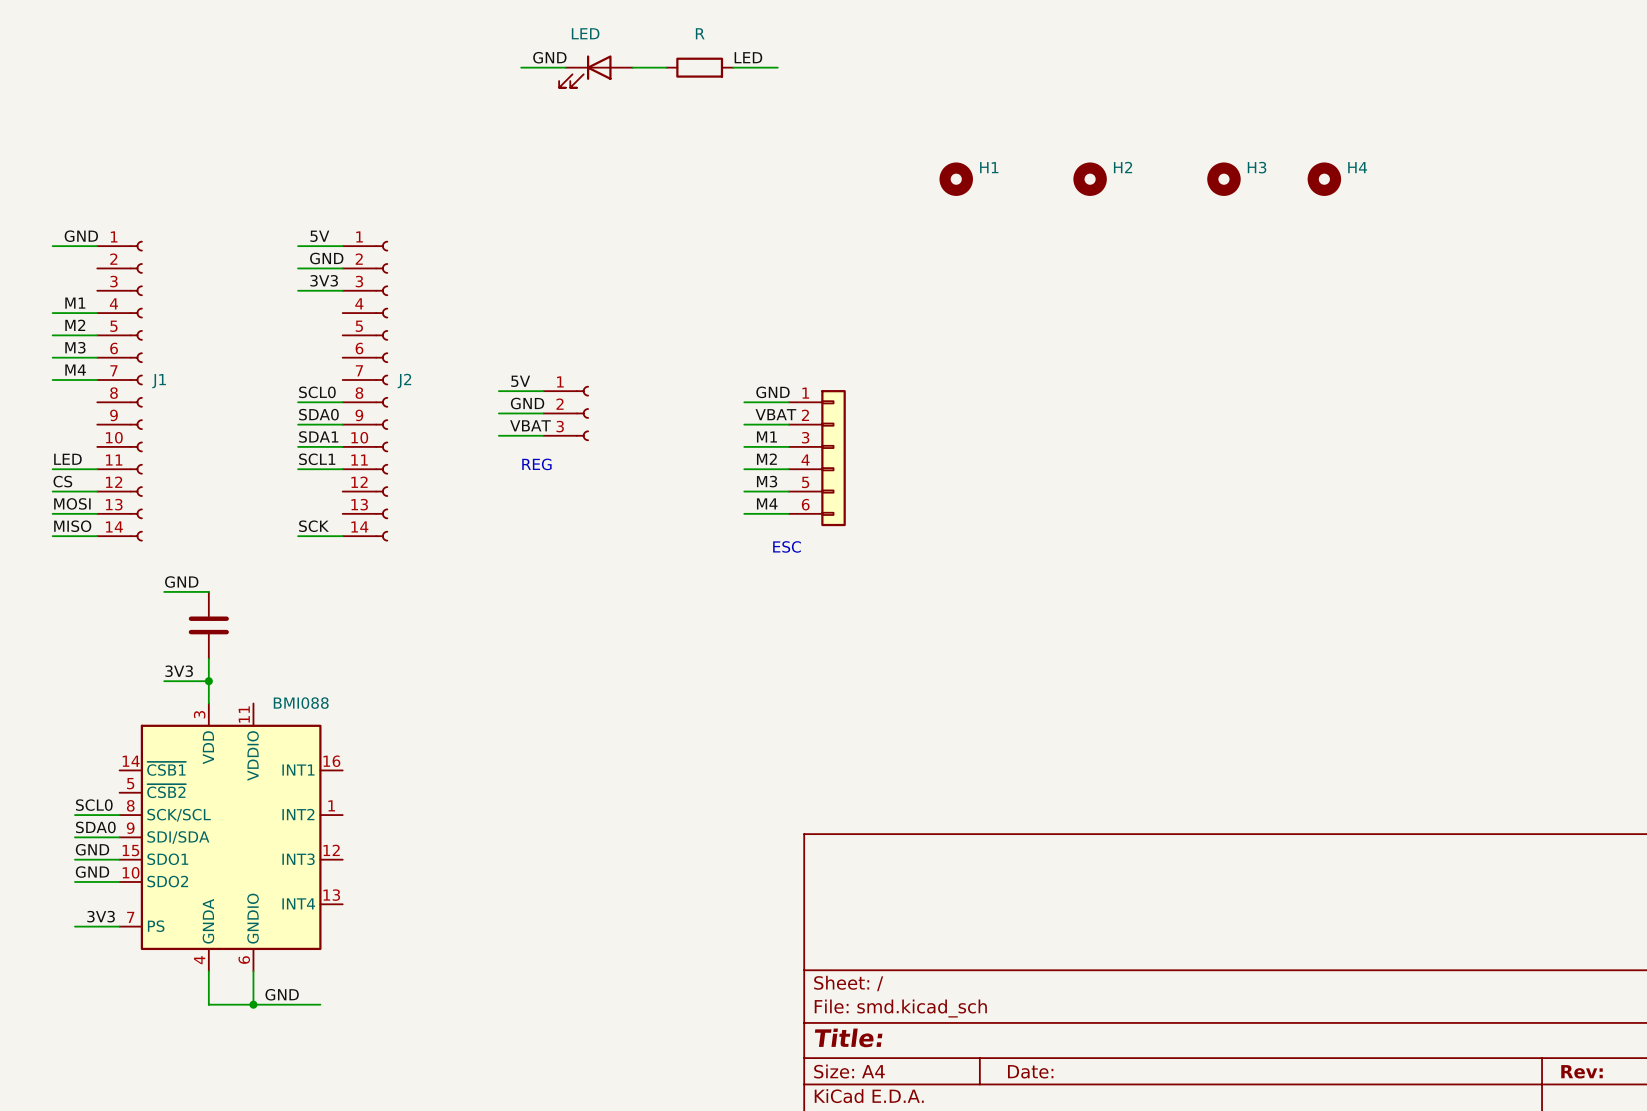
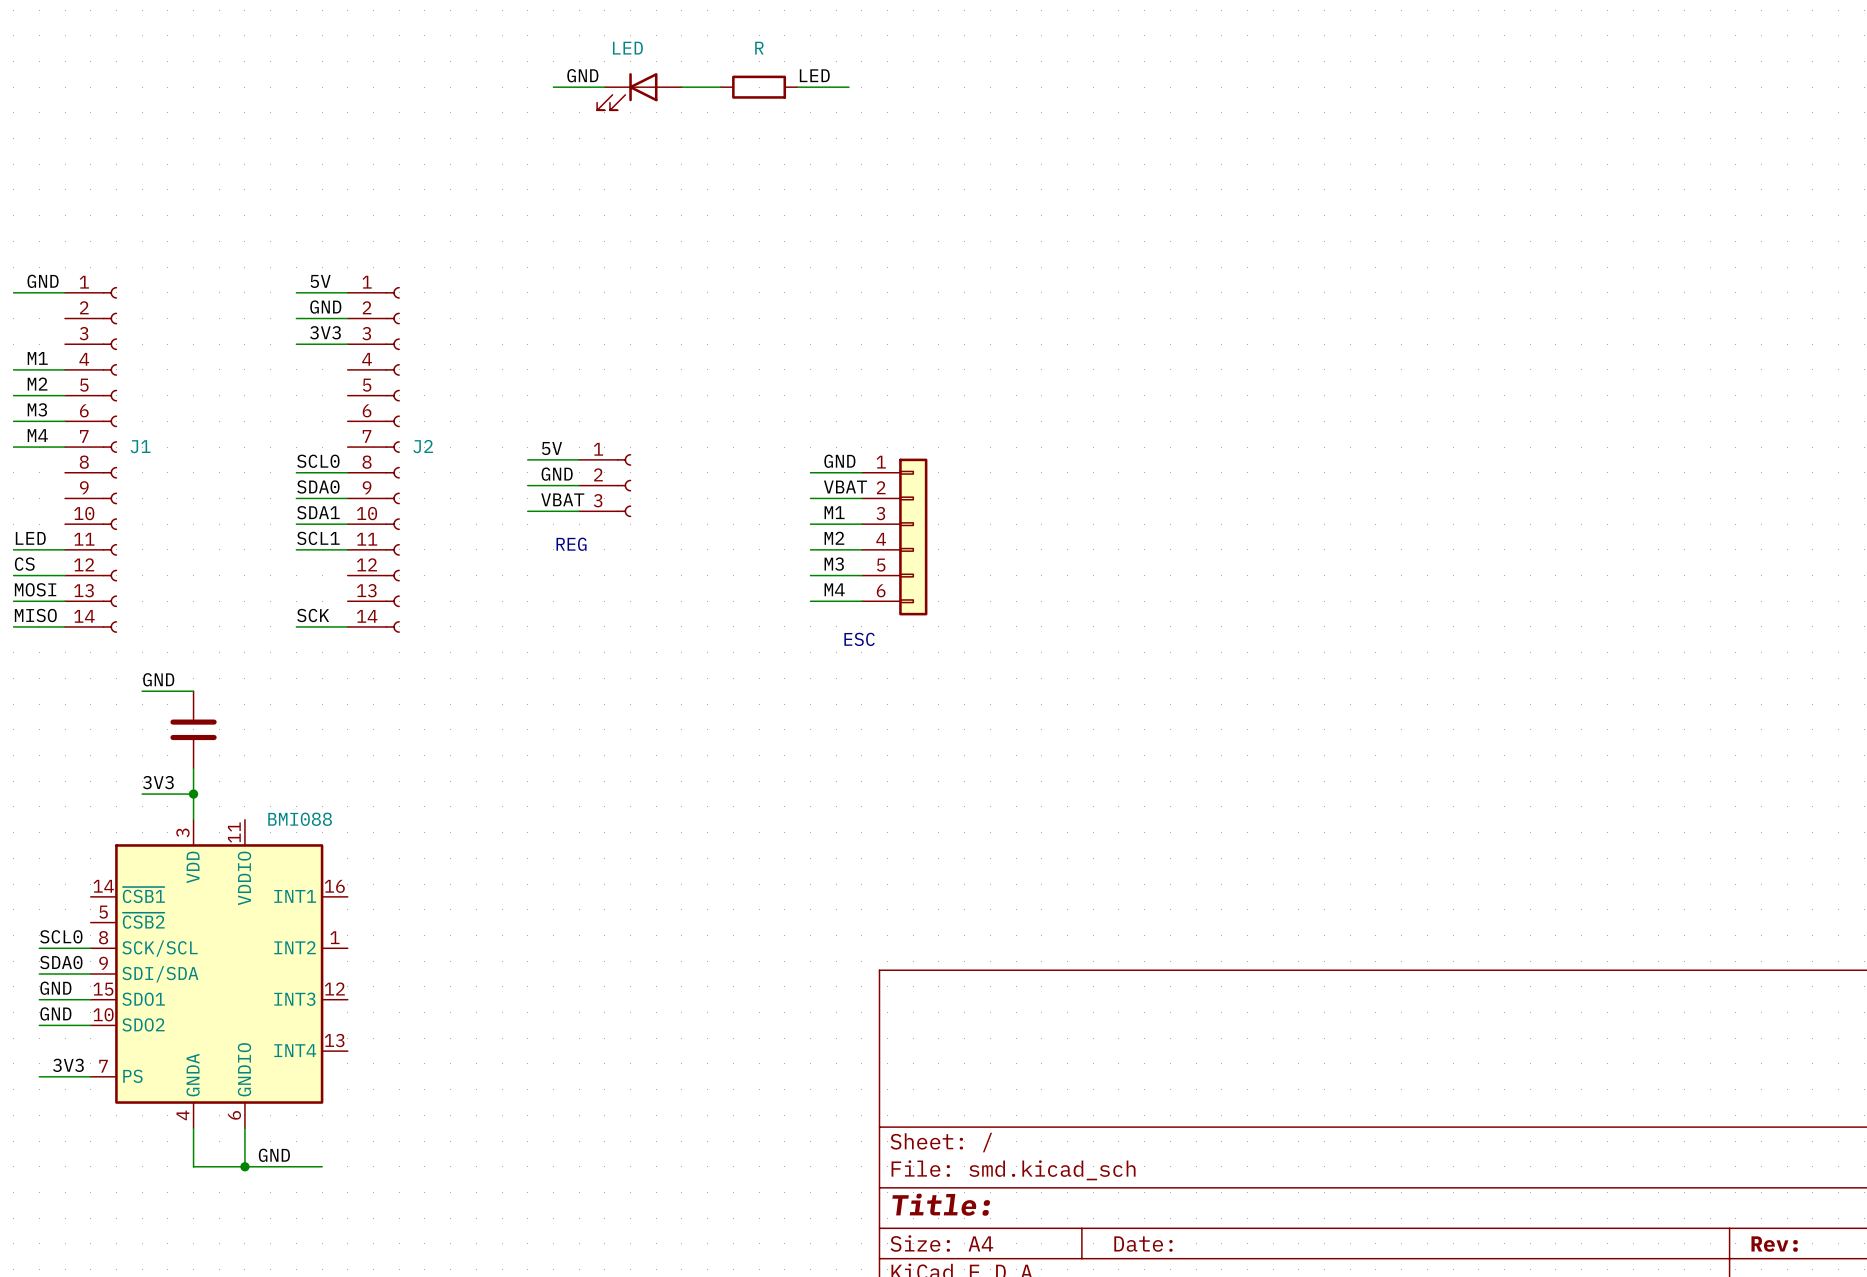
H1: (956, 179) -> none
H2: (1090, 179) -> none
H3: (1223, 179) -> none
H4: (1324, 179) -> none

